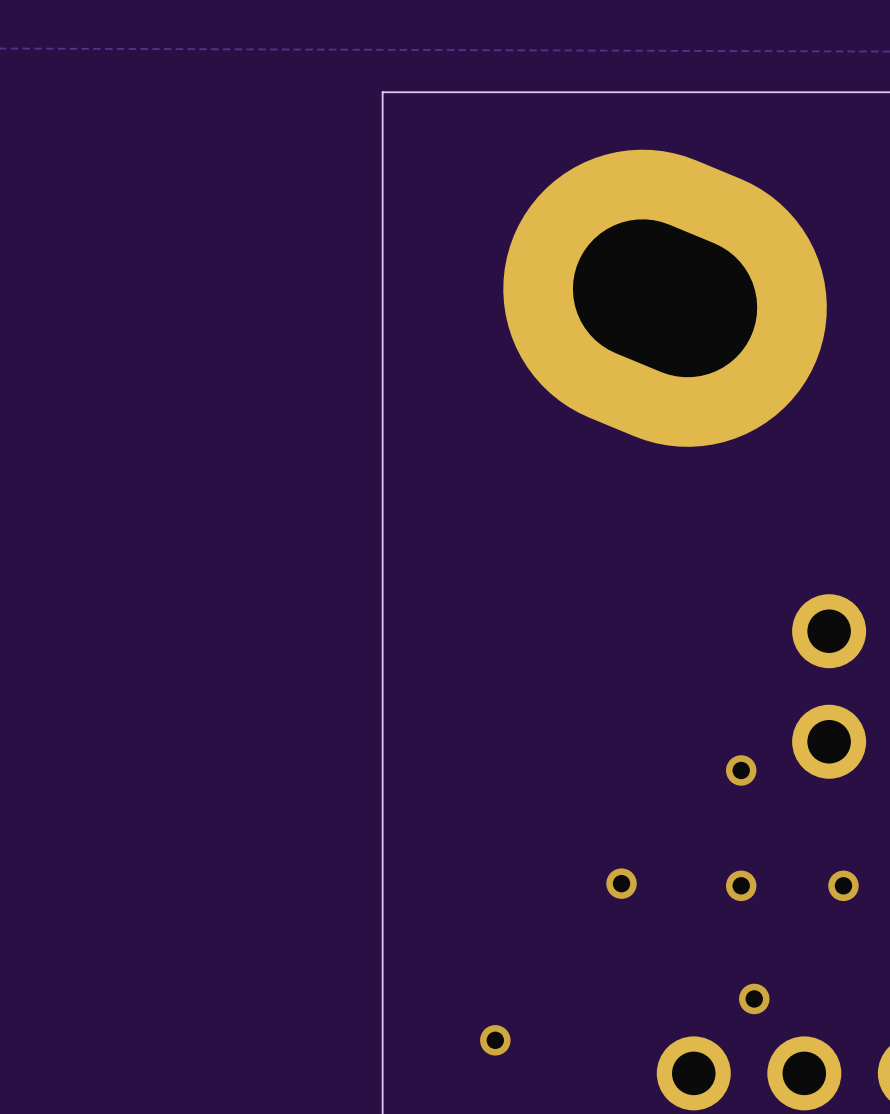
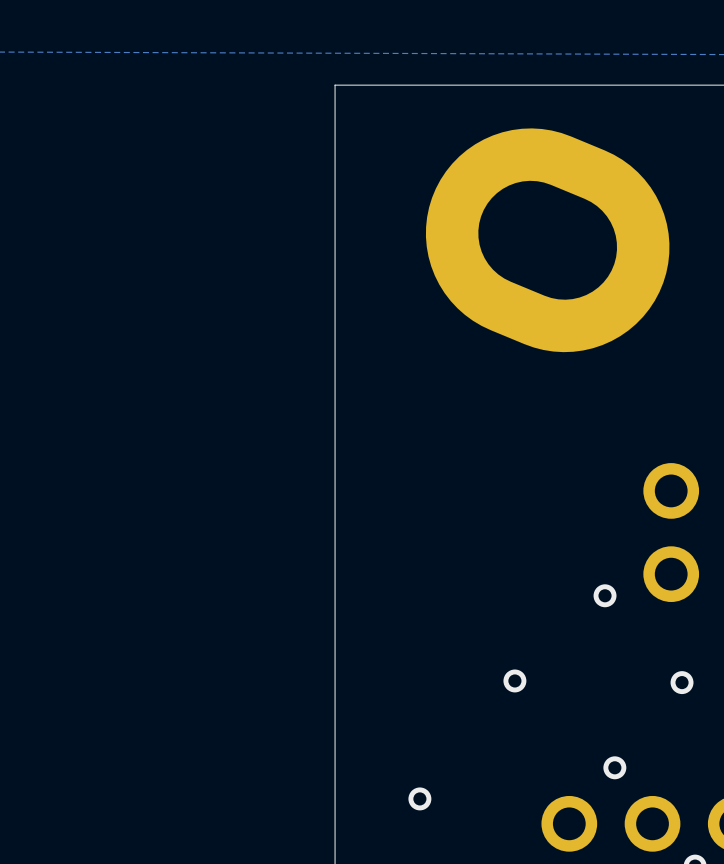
via: (741, 885) -> none

